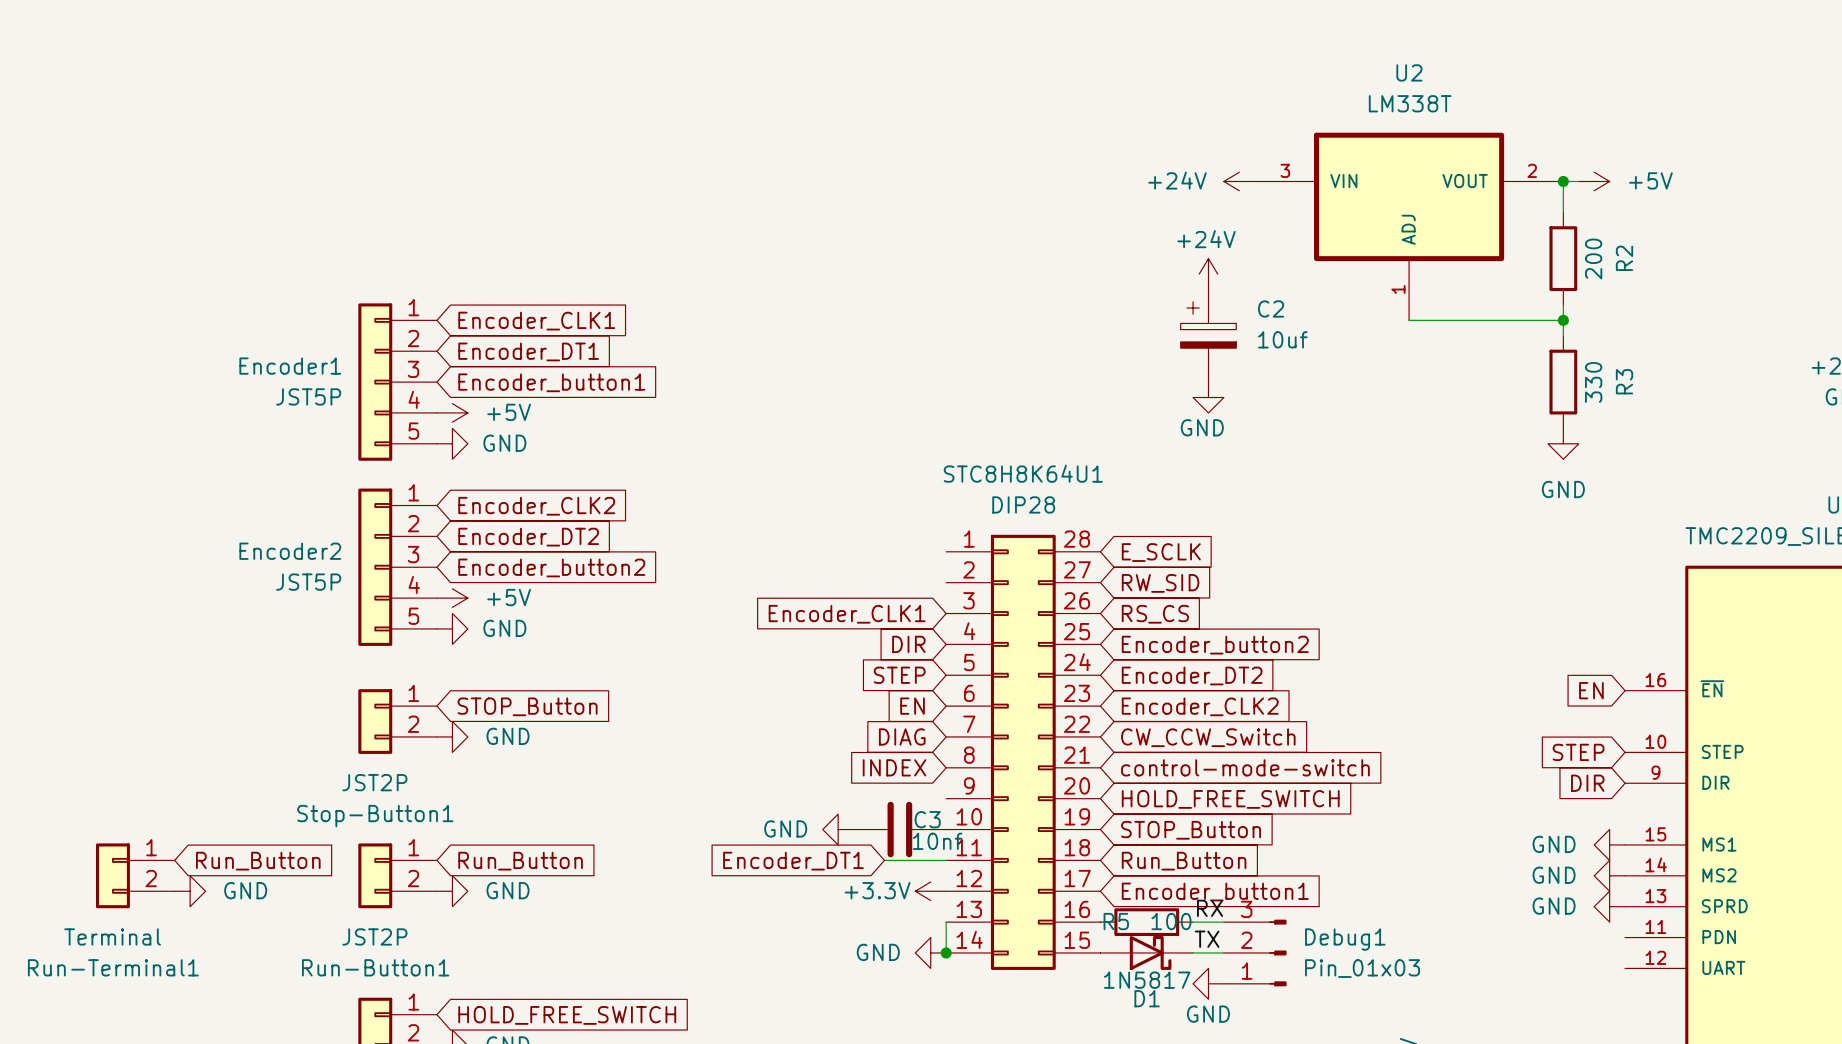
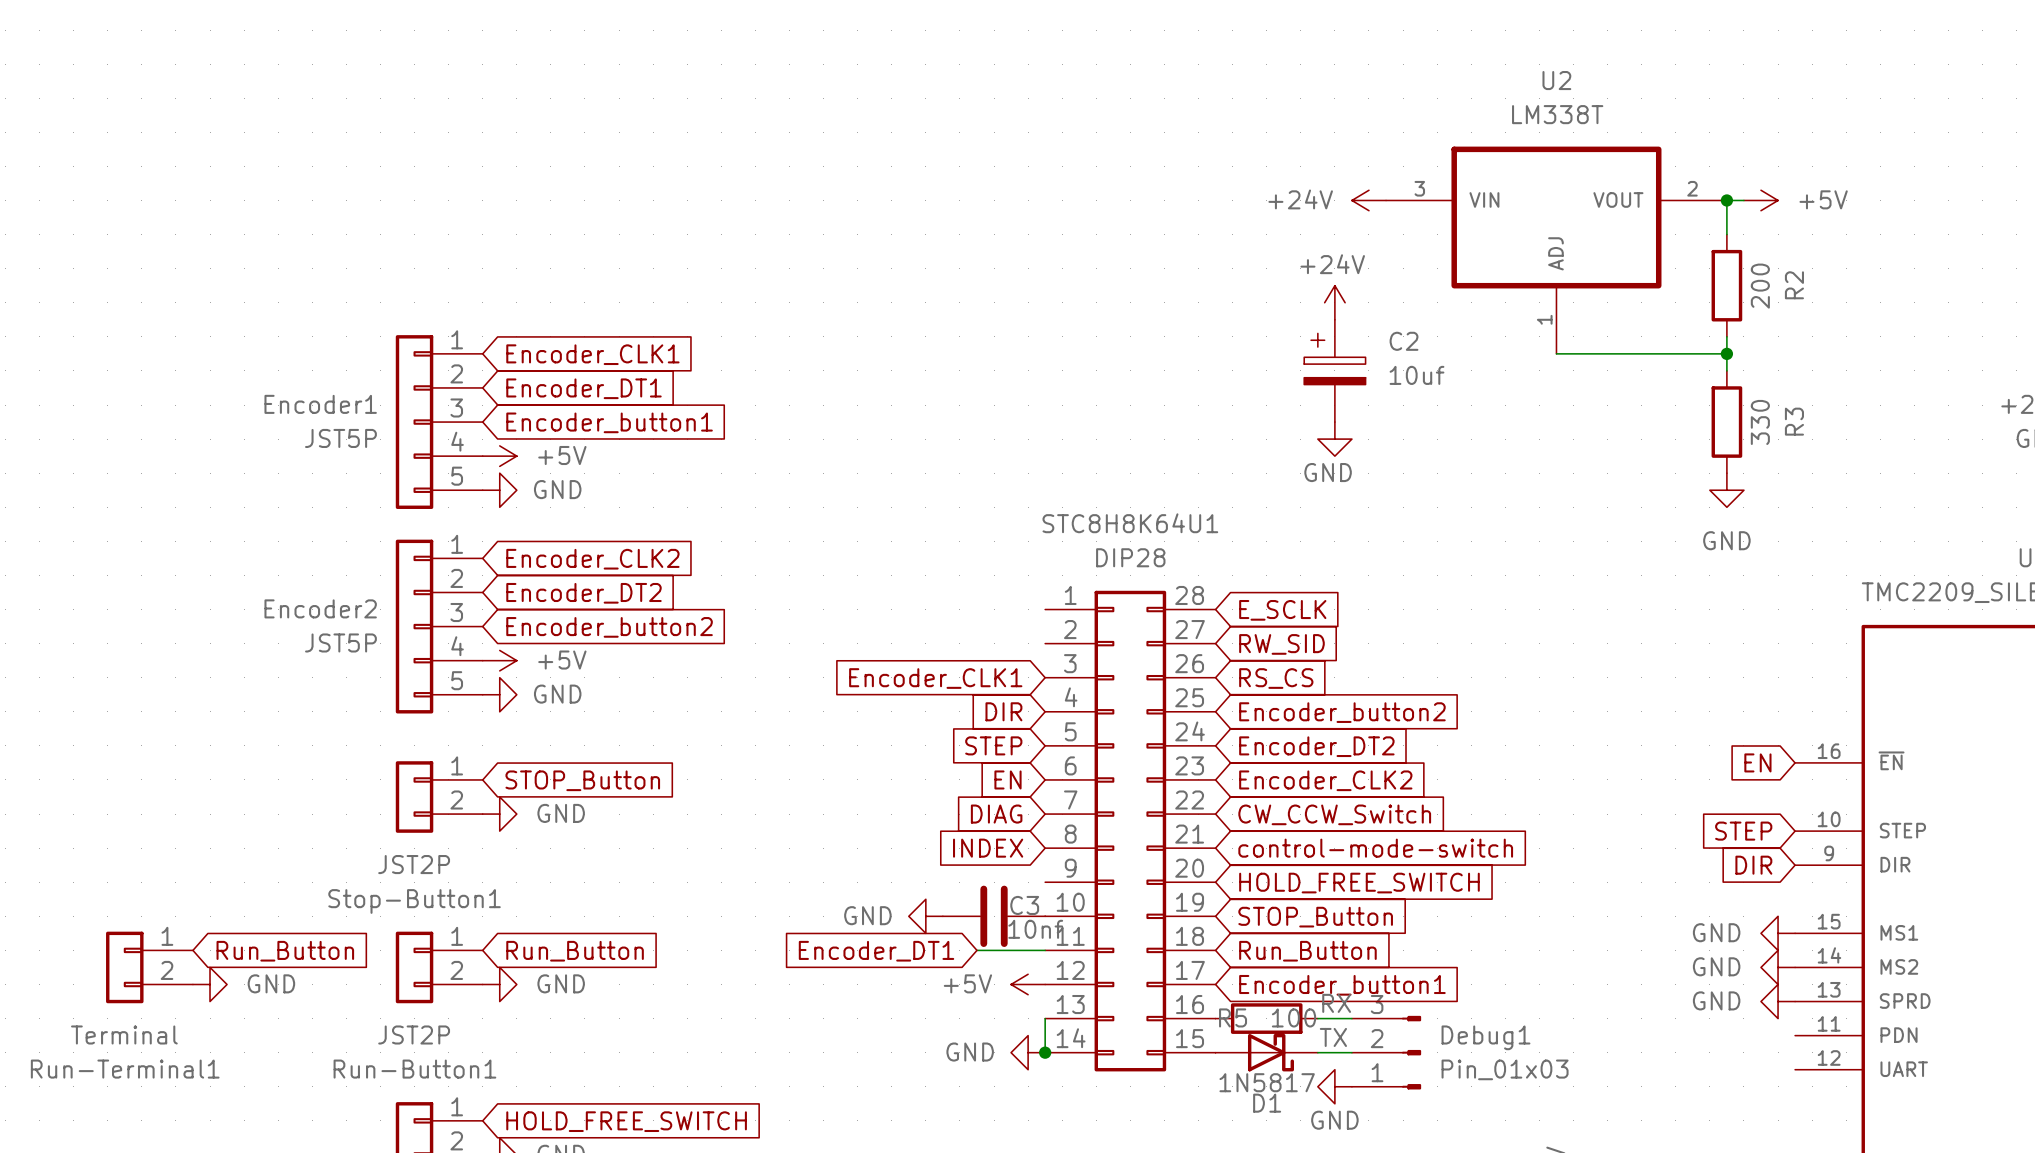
power symbol: +3.3V (930, 891) -> +5V (1028, 984)

